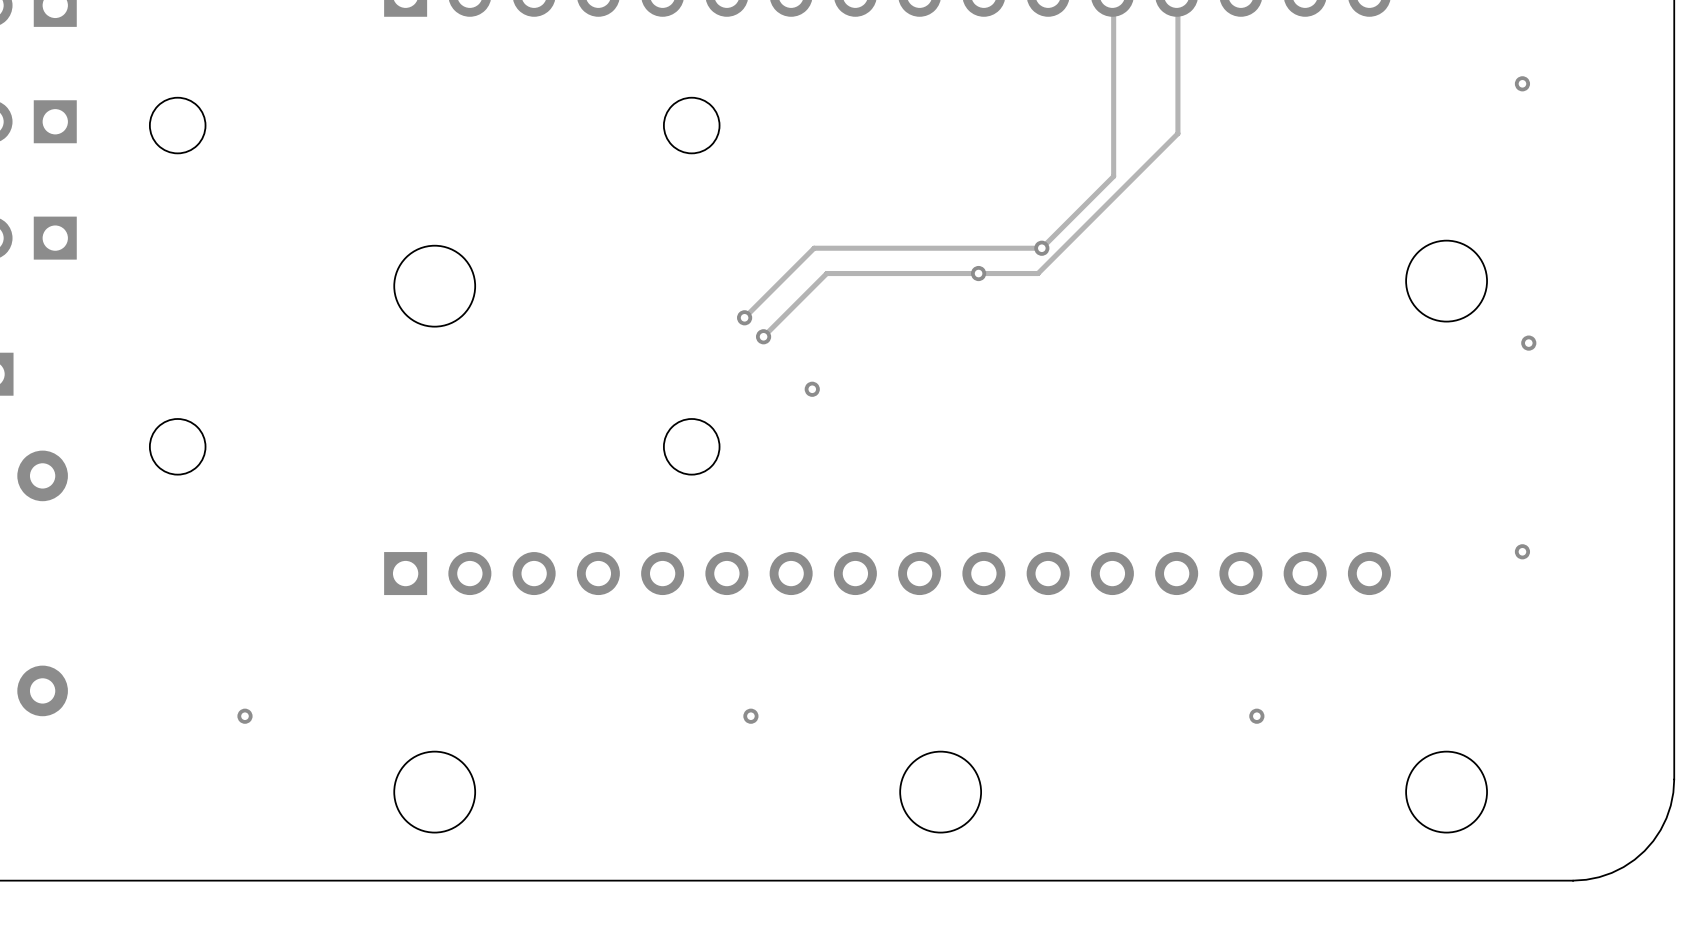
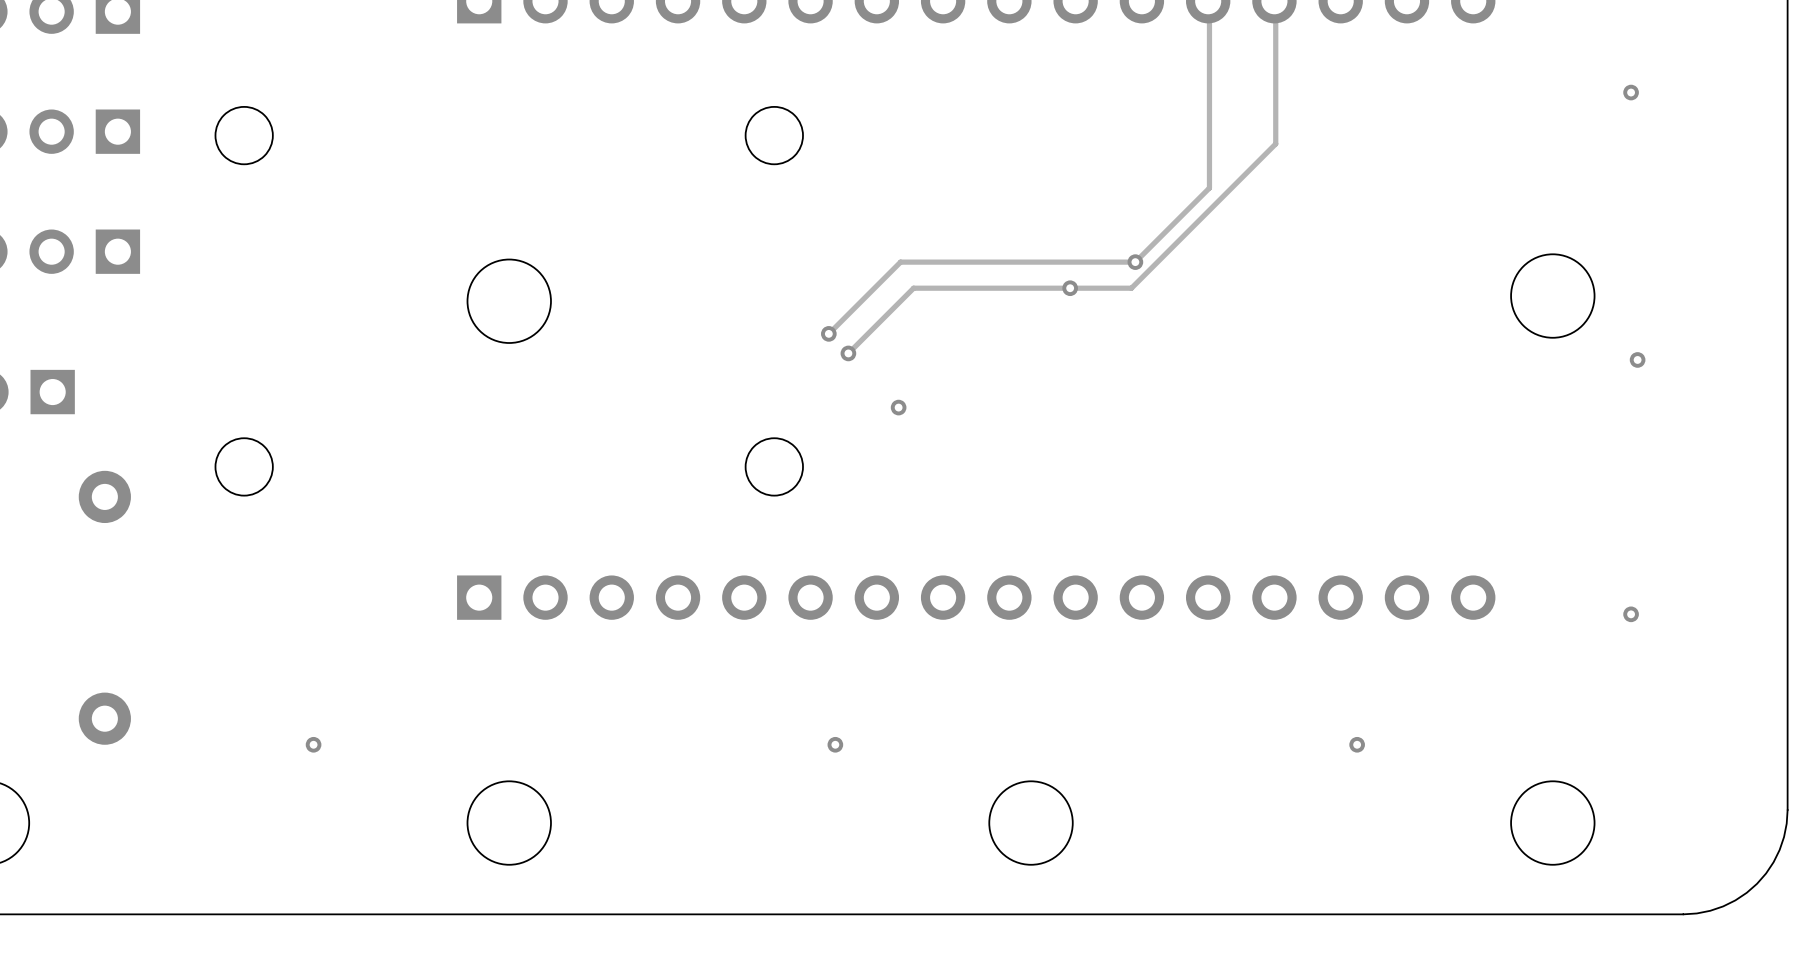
via position: (1522, 551) -> (1631, 614)

